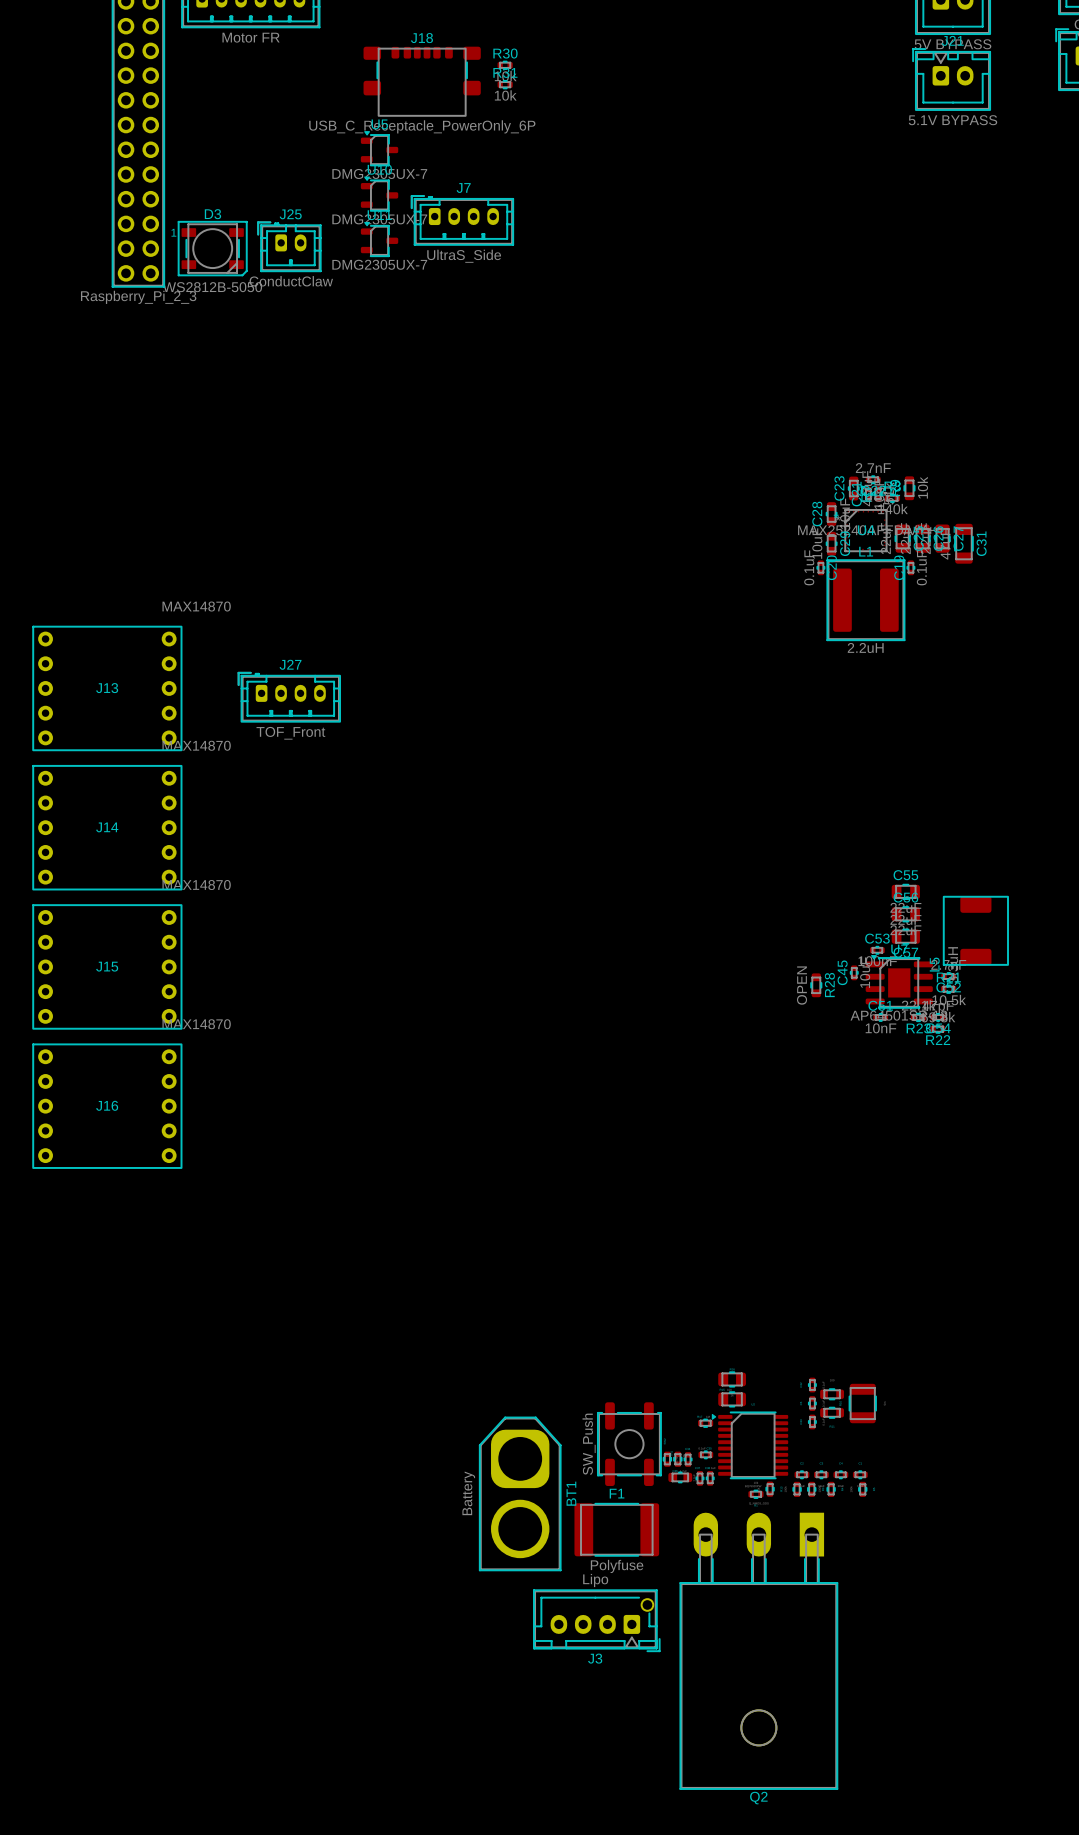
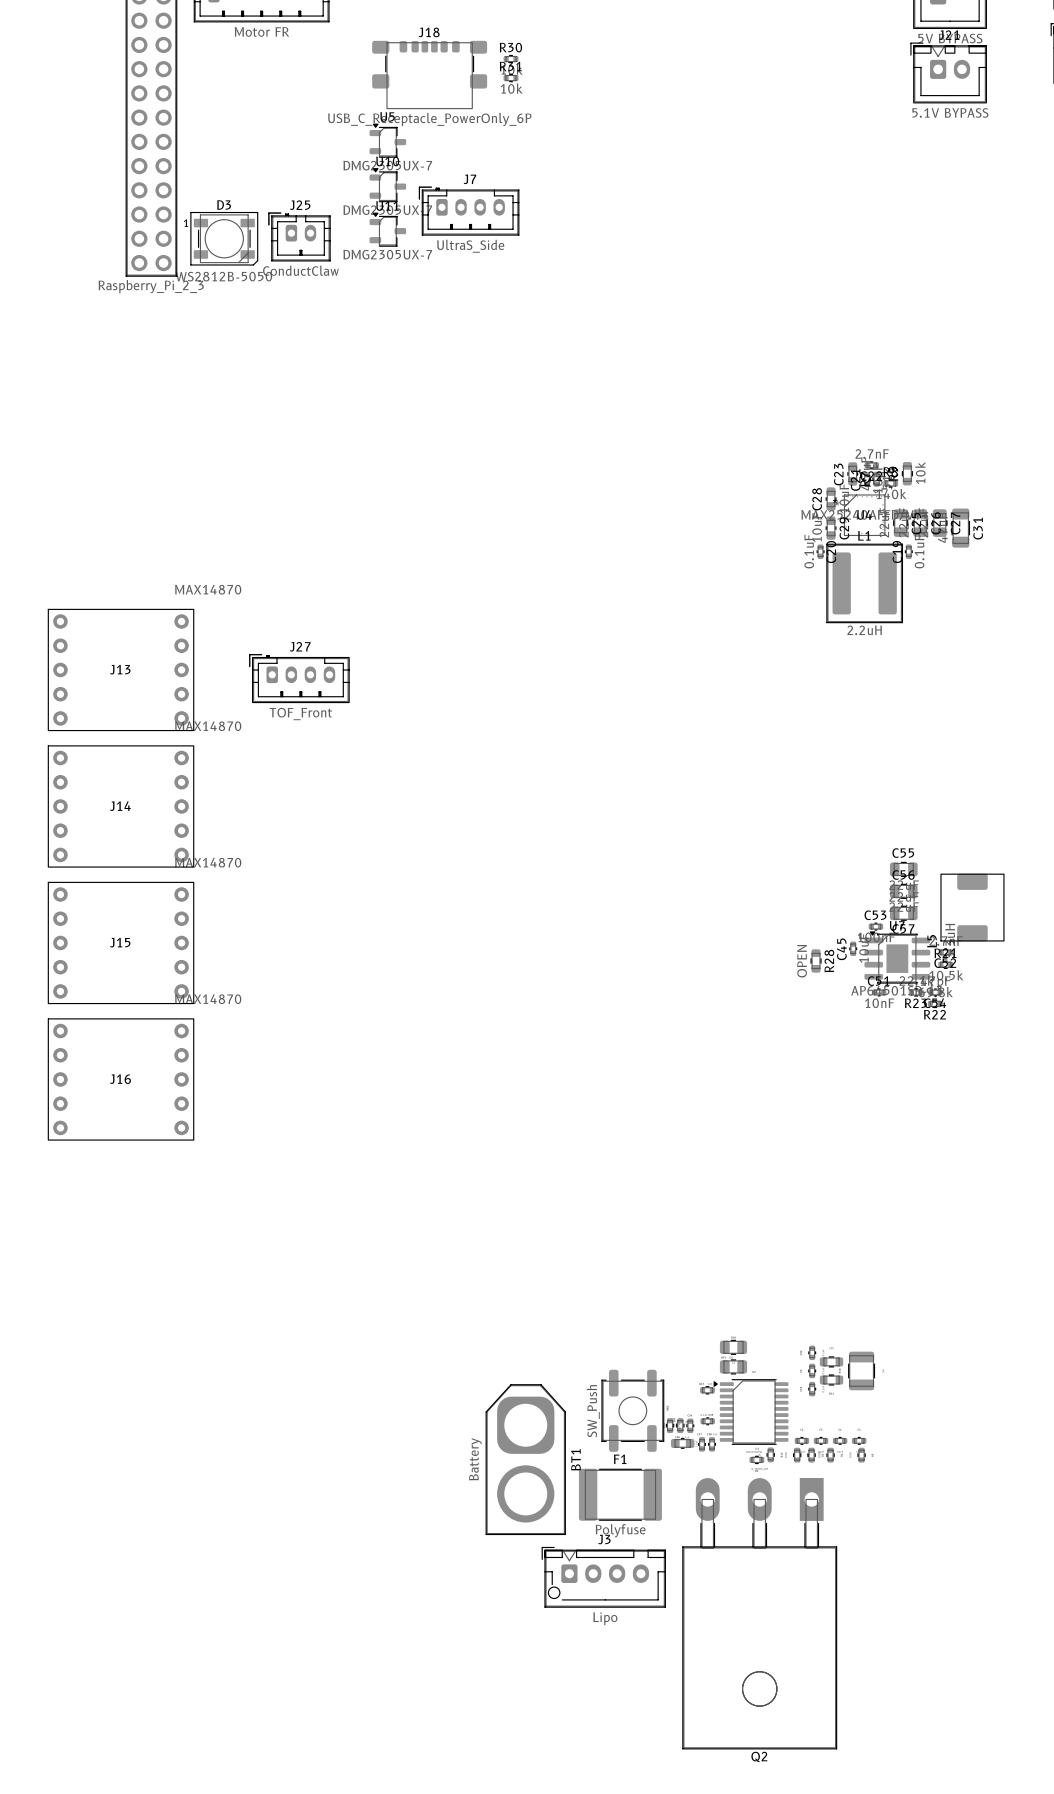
J3 rotation: 0° (596, 1620) -> 180° (603, 1577)

